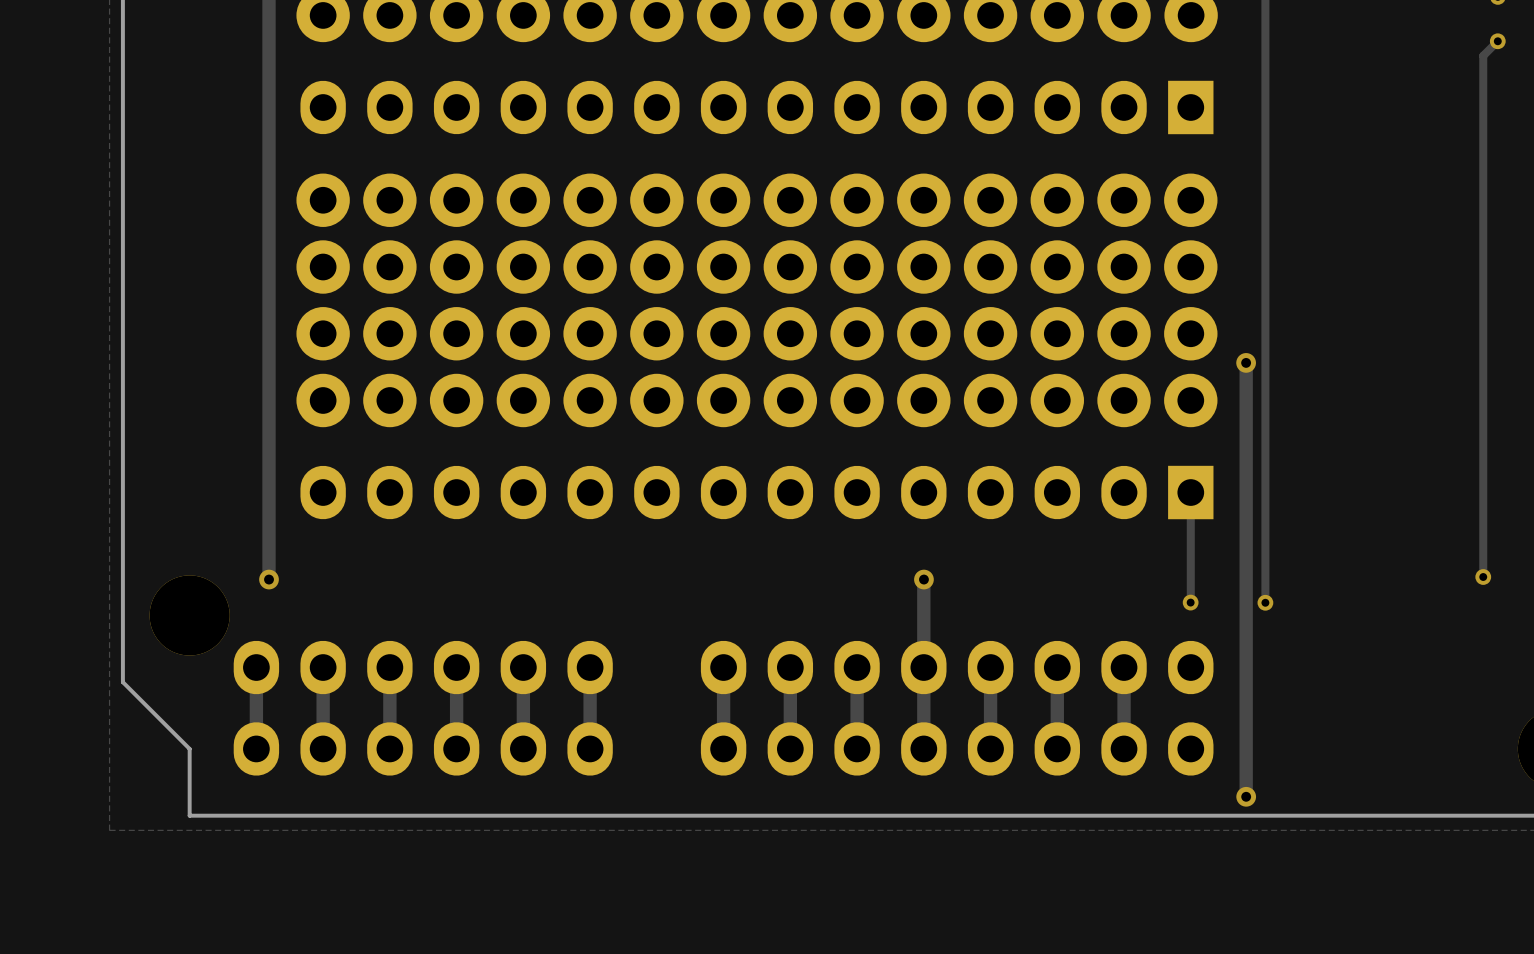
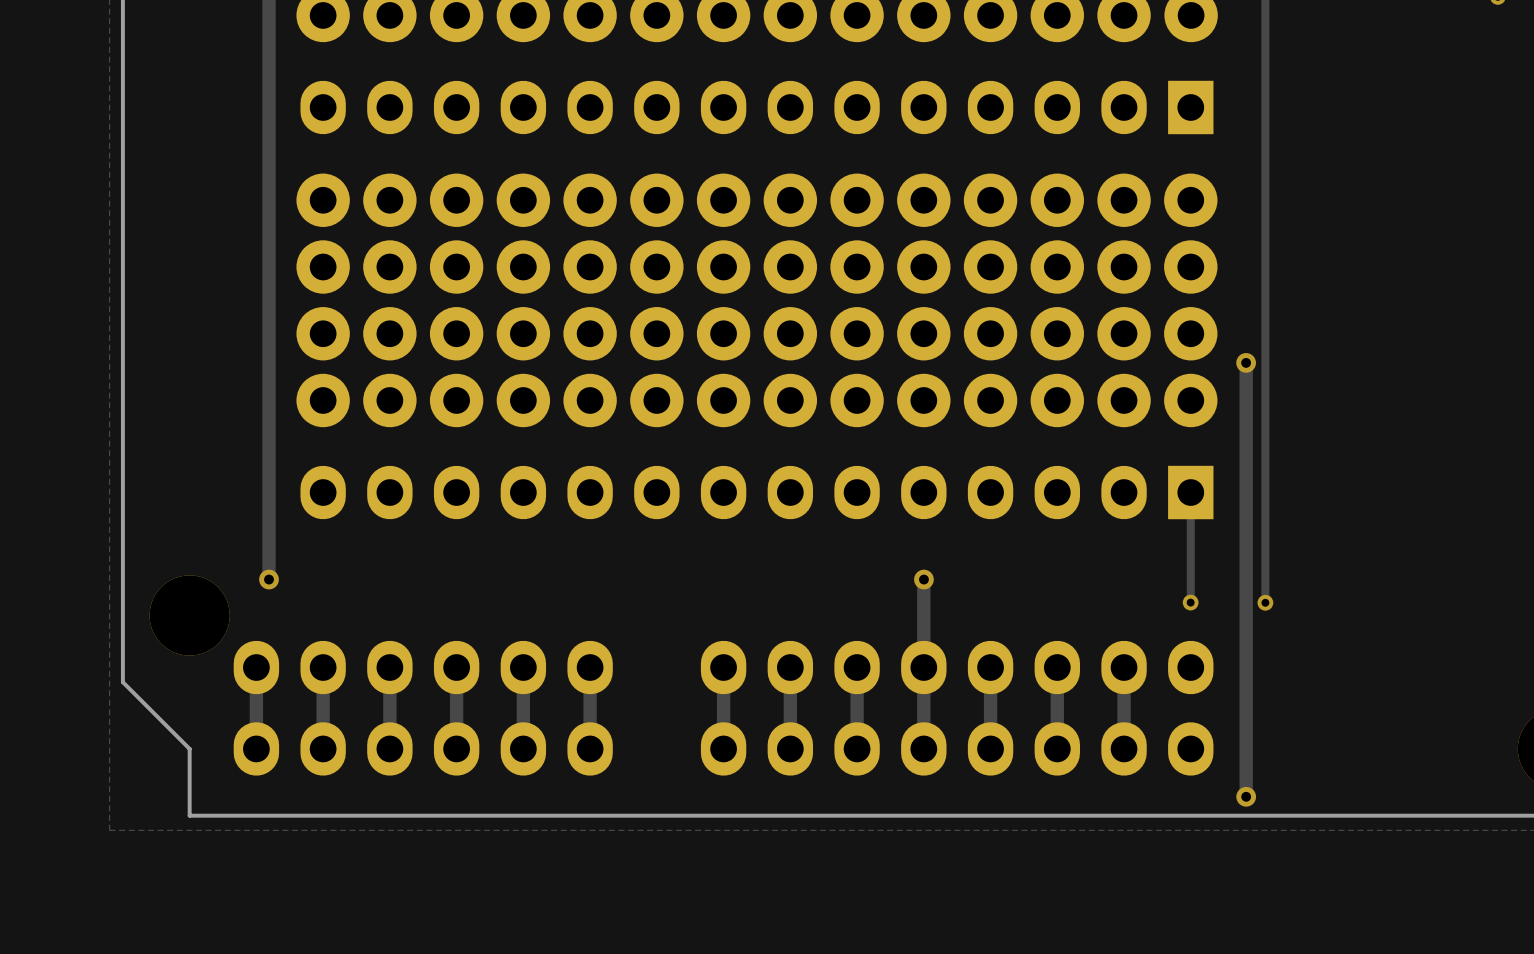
track: (1497, 41) (1483, 55) (1483, 577) -> none
via: (1497, 41) -> none
via: (1483, 577) -> none

